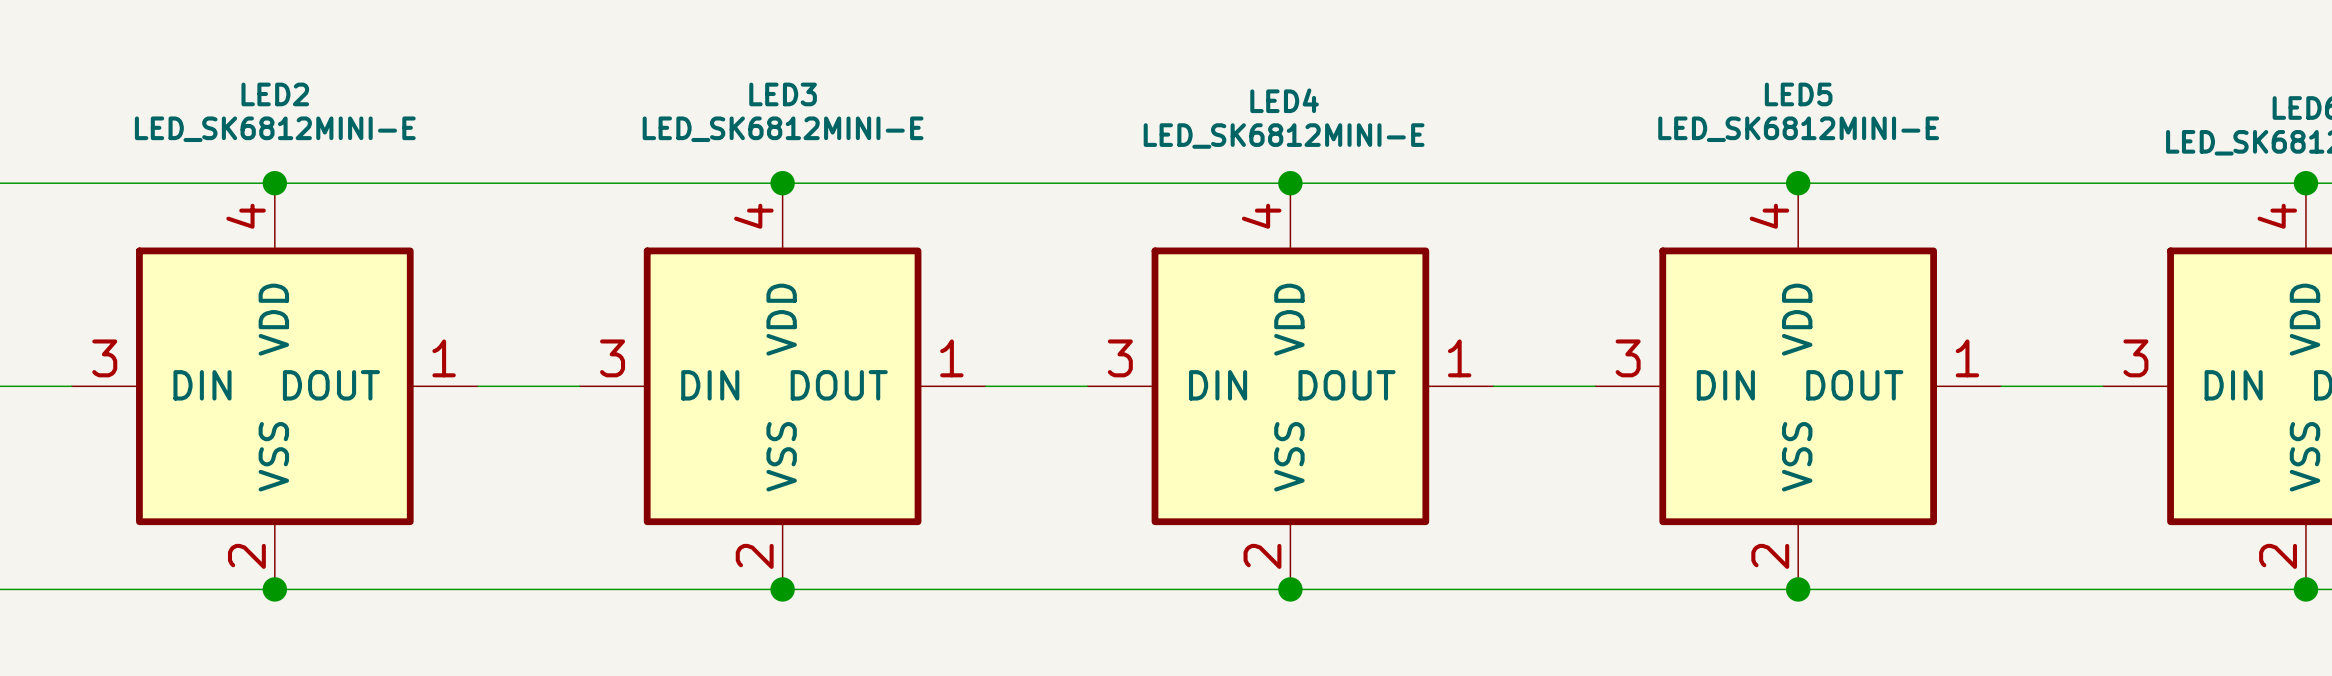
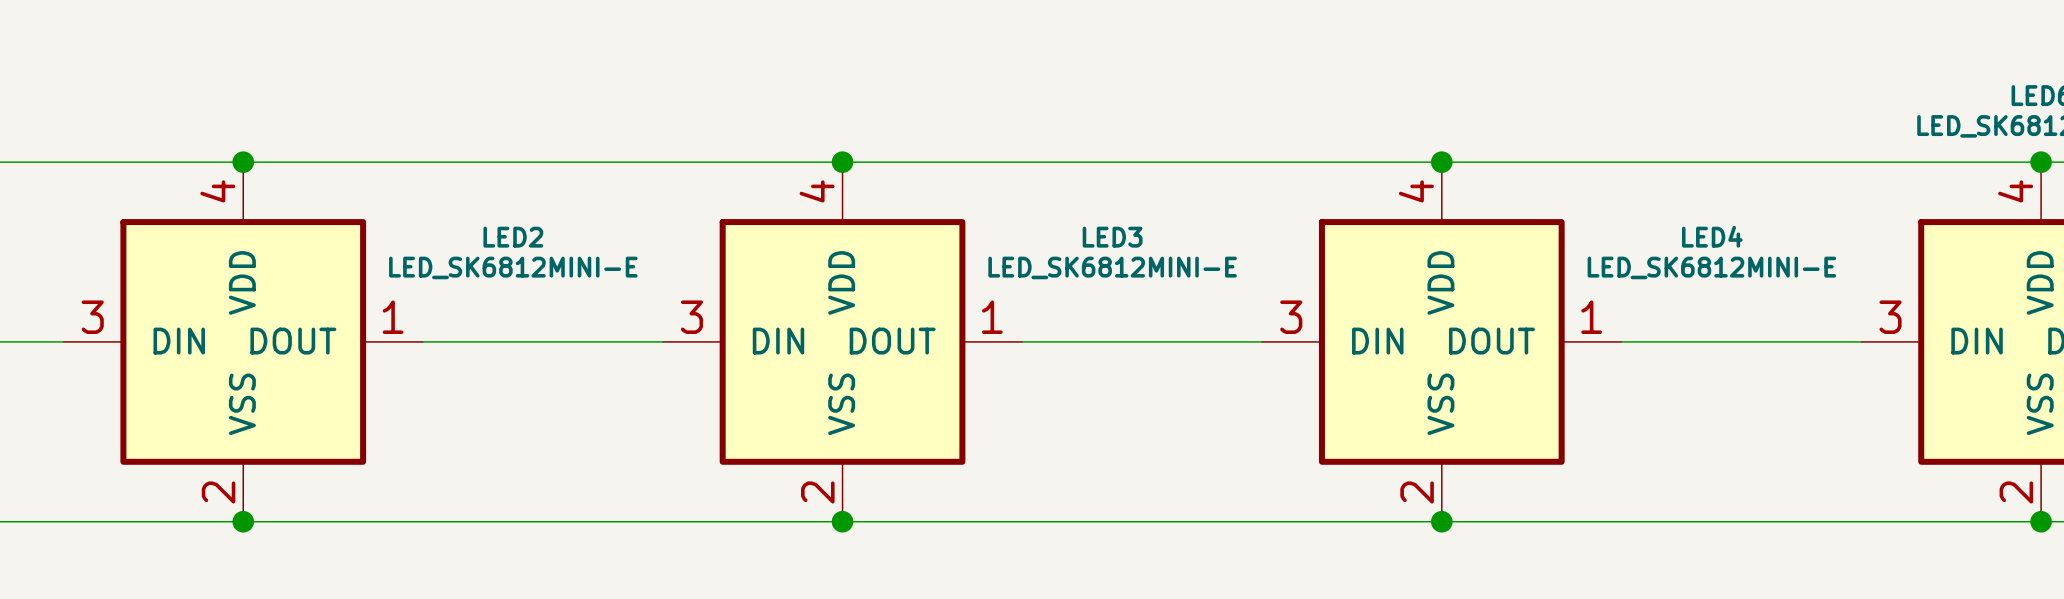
LED2 name position: LED2 (275, 94) -> LED2 (513, 237)
LED3 name position: LED3 (783, 94) -> LED3 (1112, 237)
LED4 name position: LED4 (1284, 100) -> LED4 (1712, 236)
LED2 value position: LED_SK6812MINI-E (275, 129) -> LED_SK6812MINI-E (513, 267)
LED3 value position: LED_SK6812MINI-E (783, 129) -> LED_SK6812MINI-E (1112, 267)
LED4 value position: LED_SK6812MINI-E (1284, 136) -> LED_SK6812MINI-E (1711, 267)
junction: (782, 183) -> none
junction: none -> (842, 162)
junction: (1290, 183) -> none
junction: none -> (1441, 162)
junction: (1798, 183) -> none
LED3 position: (782, 386) -> (842, 341)
LED4 position: (1290, 386) -> (1441, 341)
LED5: LED_SK6812MINI-E (1798, 386) -> none
junction: (782, 589) -> none
junction: none -> (842, 521)
junction: (1290, 589) -> none
junction: none -> (1441, 521)
junction: (1798, 589) -> none

